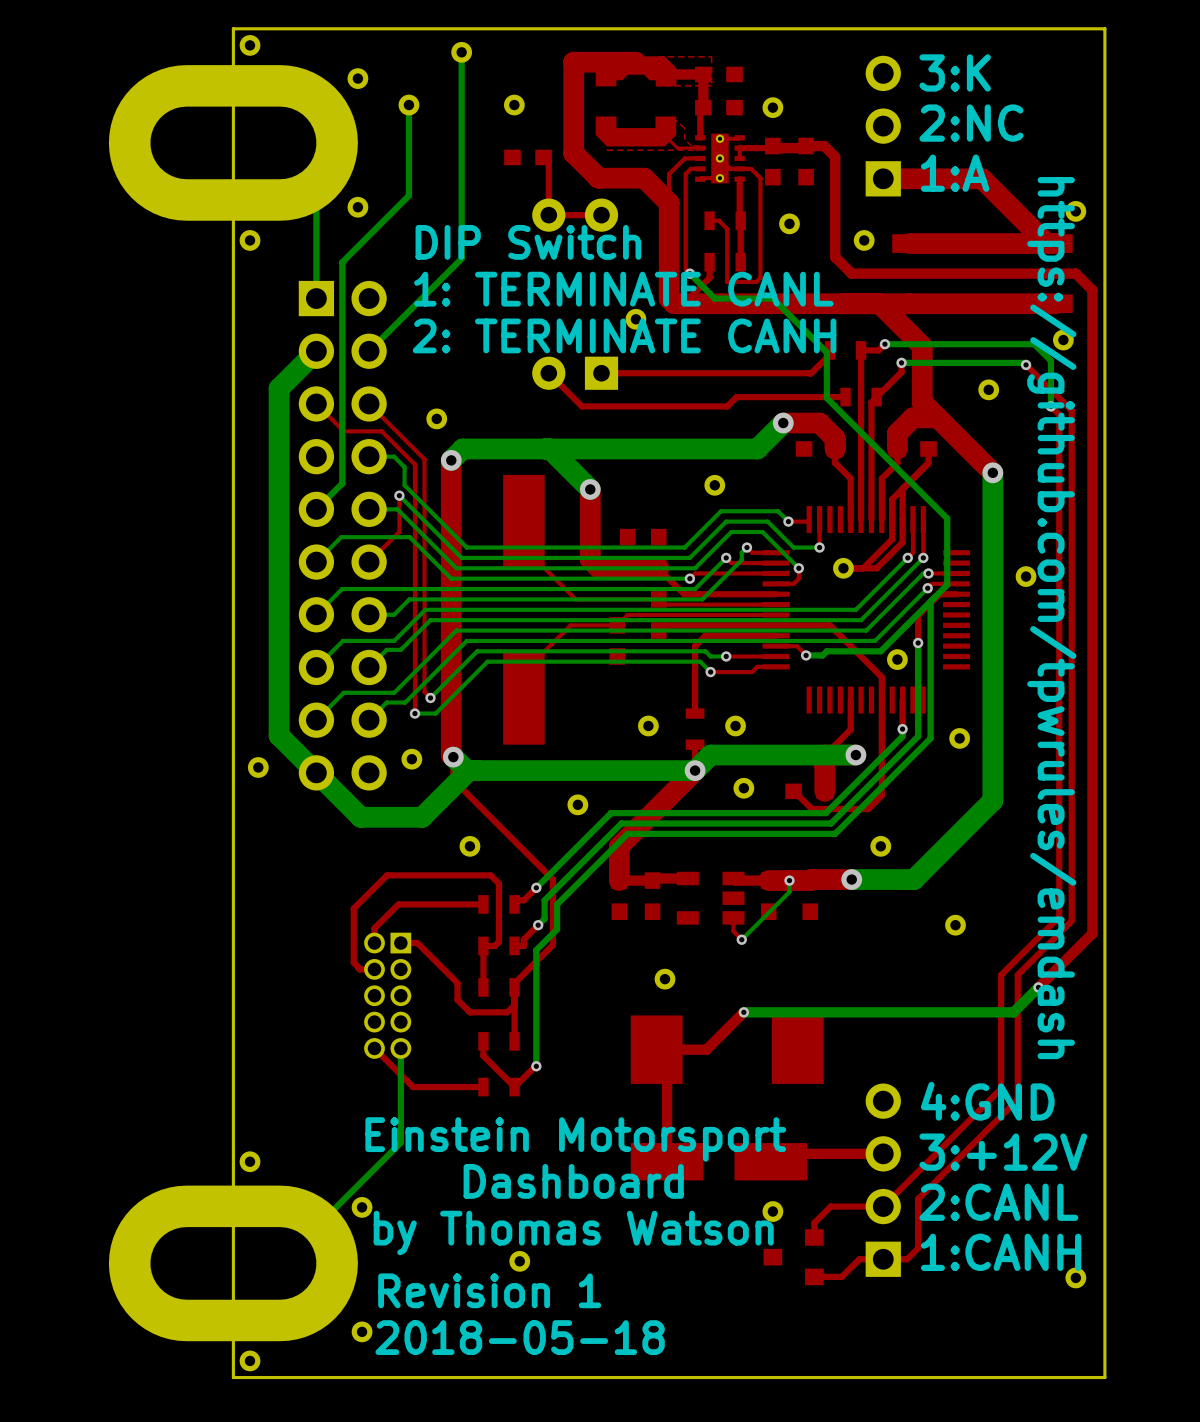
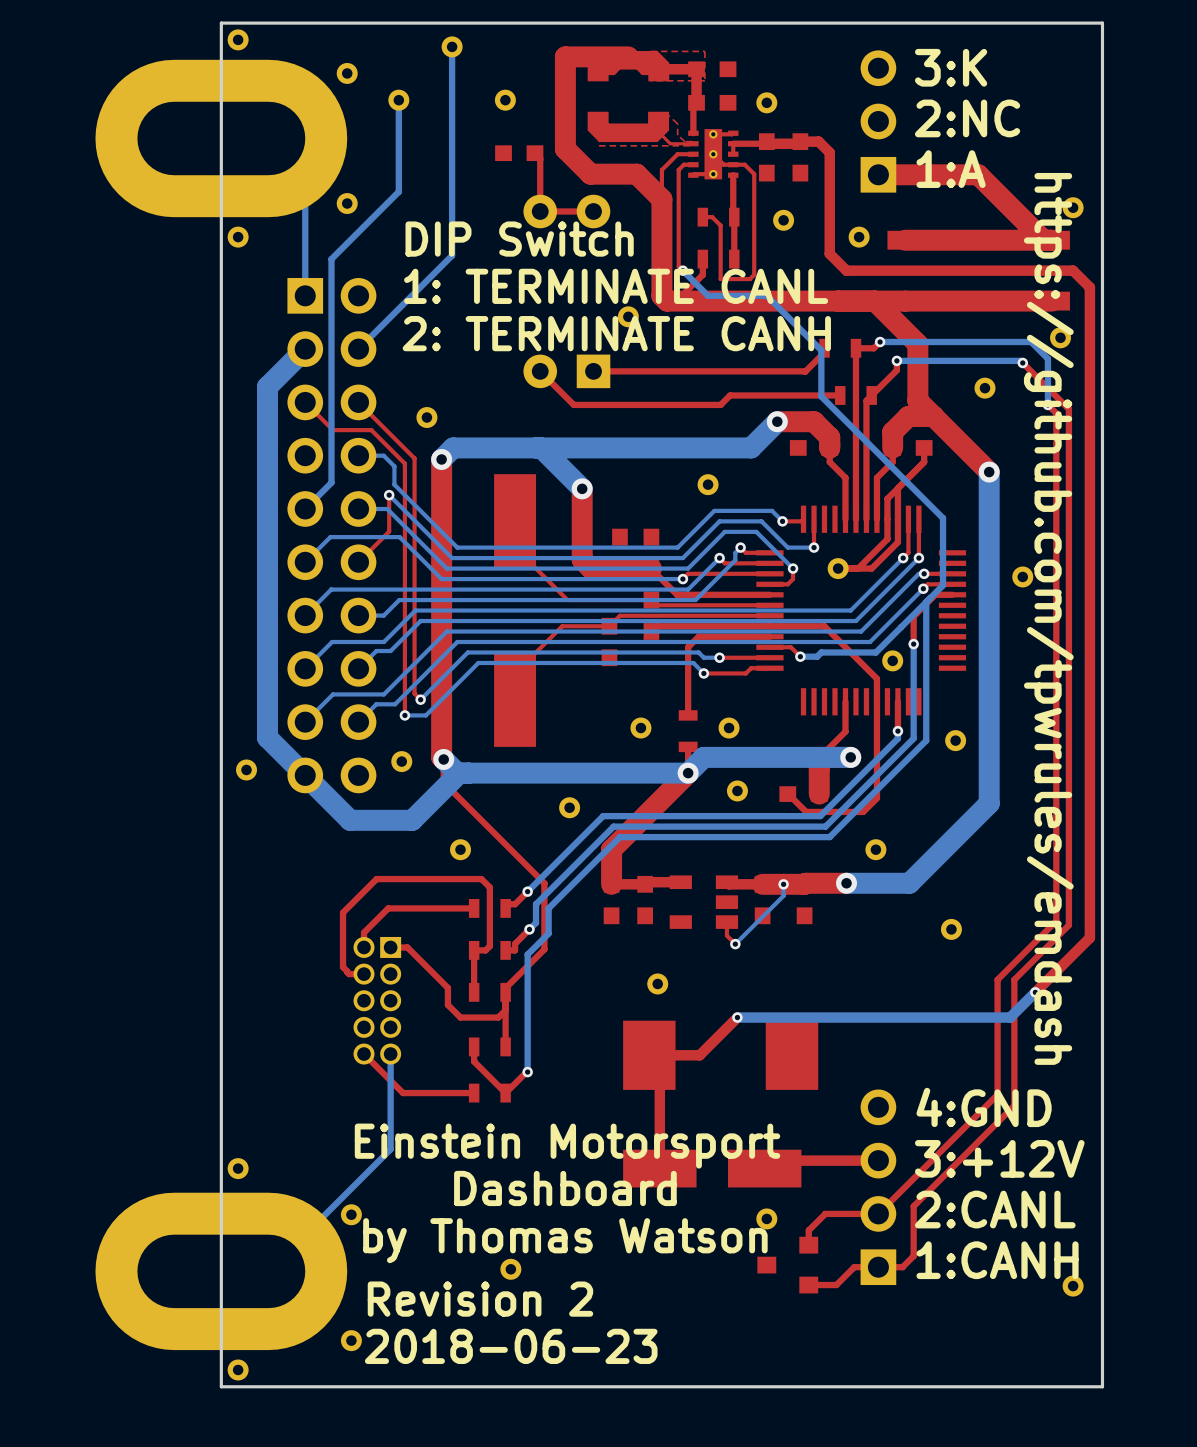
text: Revision 1 (489, 1290) -> Revision 2 (480, 1299)
text: 2018-05-18 (520, 1337) -> 2018-06-23 (511, 1346)

